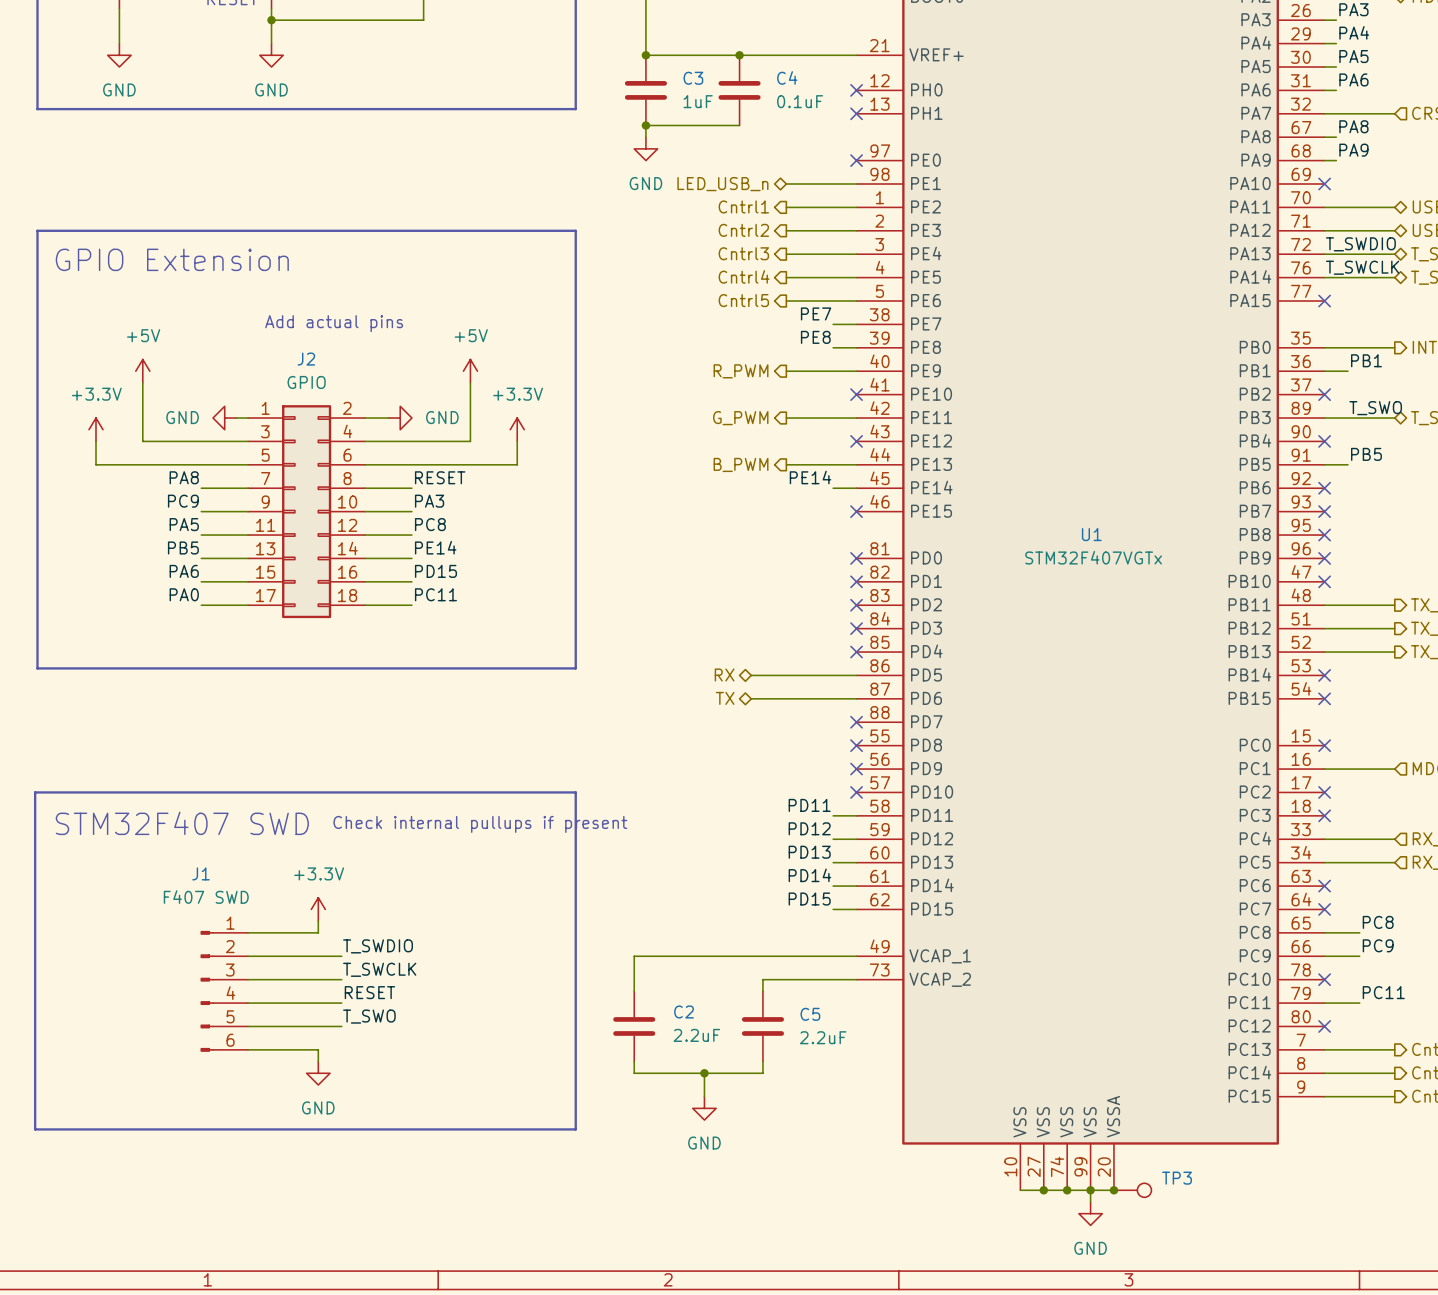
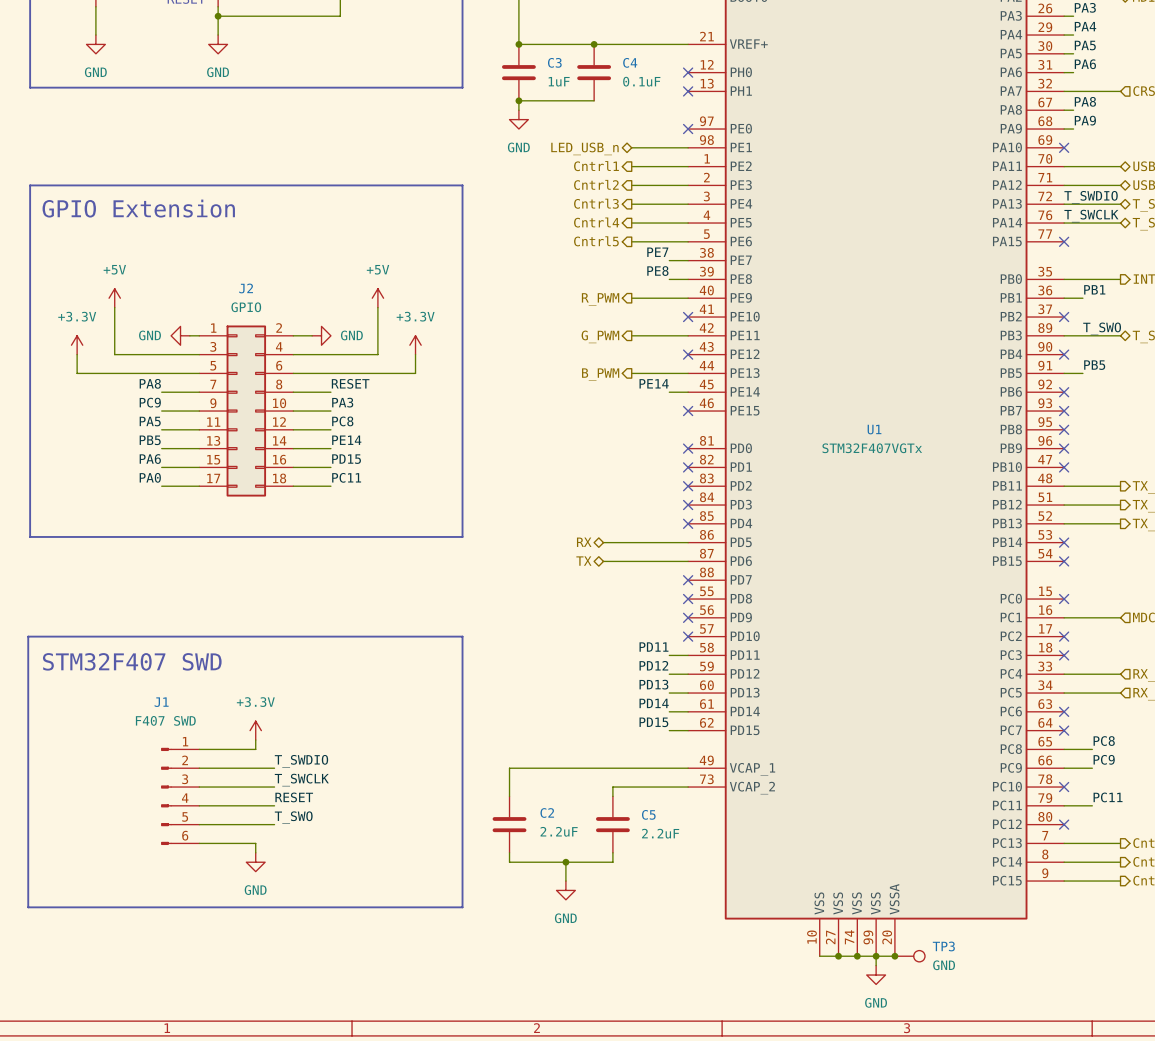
text: Add actual pins (334, 323) -> none
text: Check internal pullups if present (480, 824) -> none
TP3 value: none -> GND (944, 965)

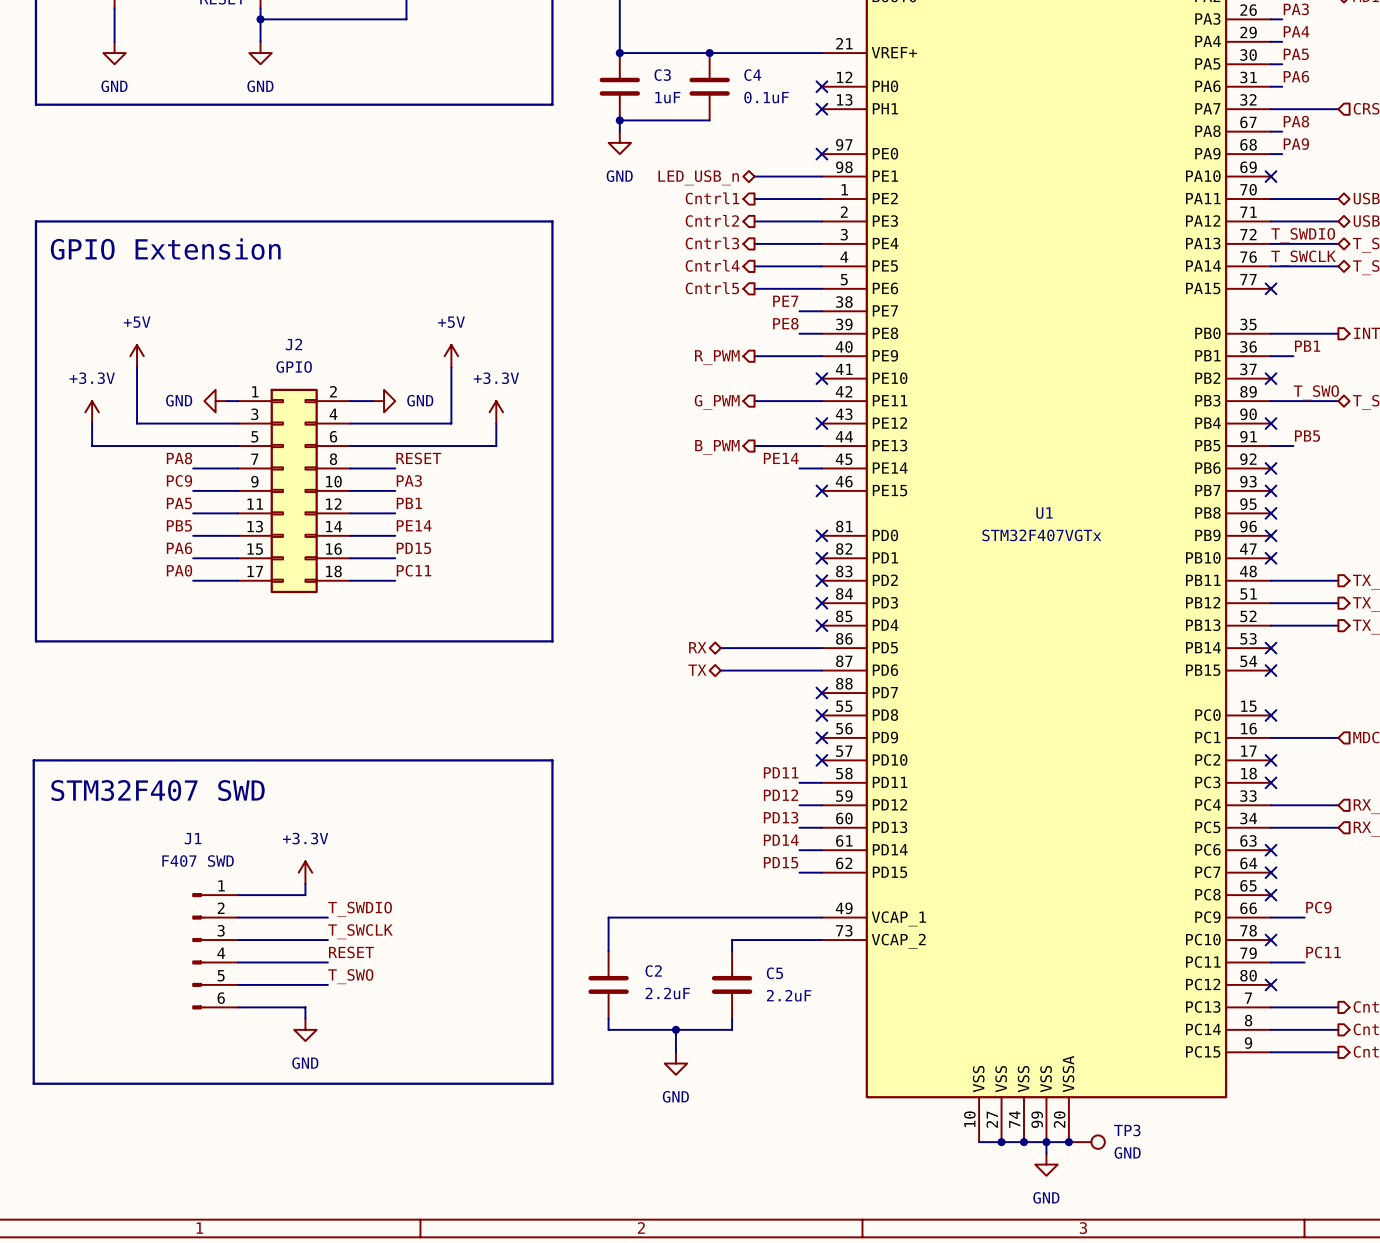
label: PC8 (342, 421) -> PB1 (409, 503)
label: PC8 (1104, 741) -> none
wire: (1064, 749) (1092, 749) -> none
no-connect mark: none -> (1271, 895)

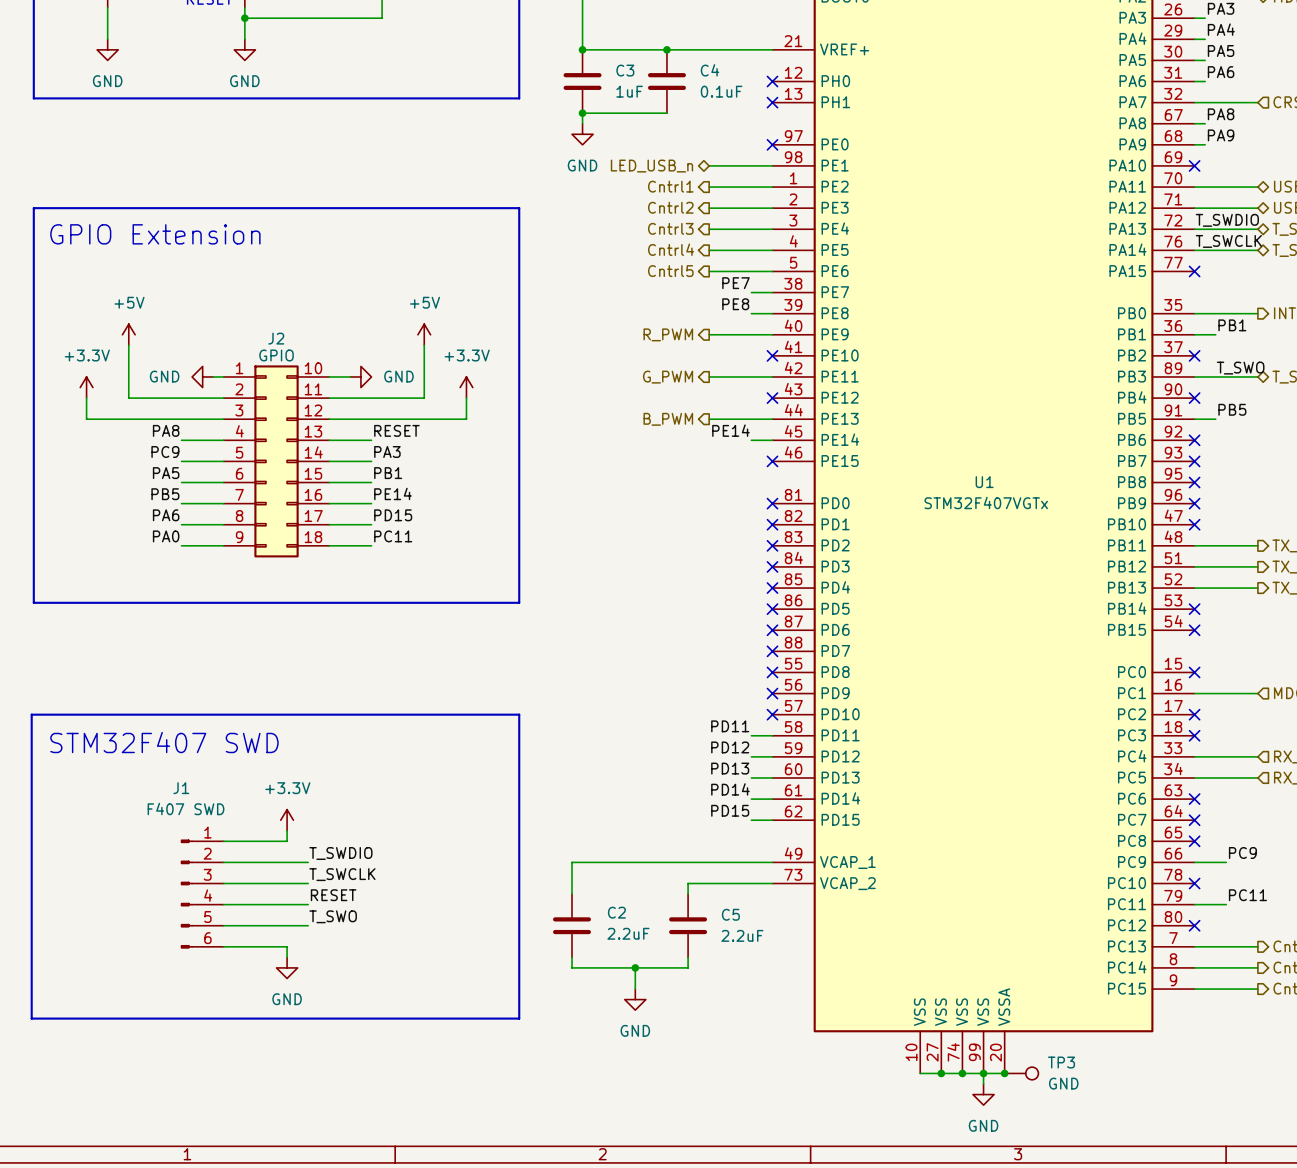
J2 symbol: [238, 388, 351, 594] -> [223, 365, 330, 558]
hierarchical label: RX (697, 647) -> none
wire: (720, 648) (821, 648) -> none
no-connect mark: none -> (772, 609)
hierarchical label: TX (697, 670) -> none
wire: (720, 670) (821, 670) -> none
no-connect mark: none -> (772, 630)

